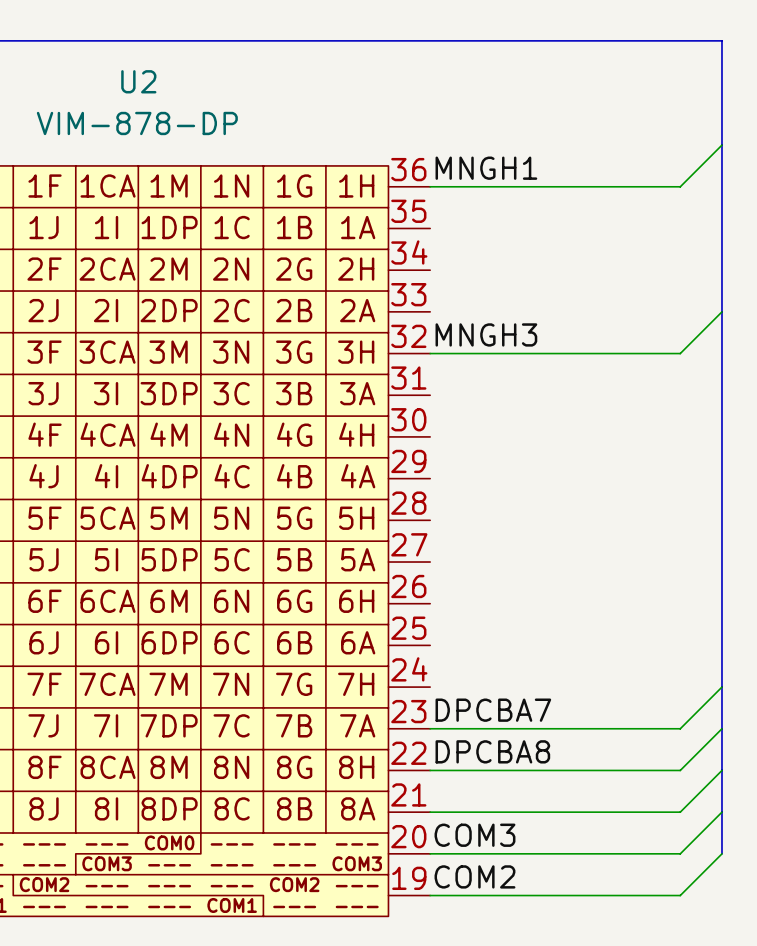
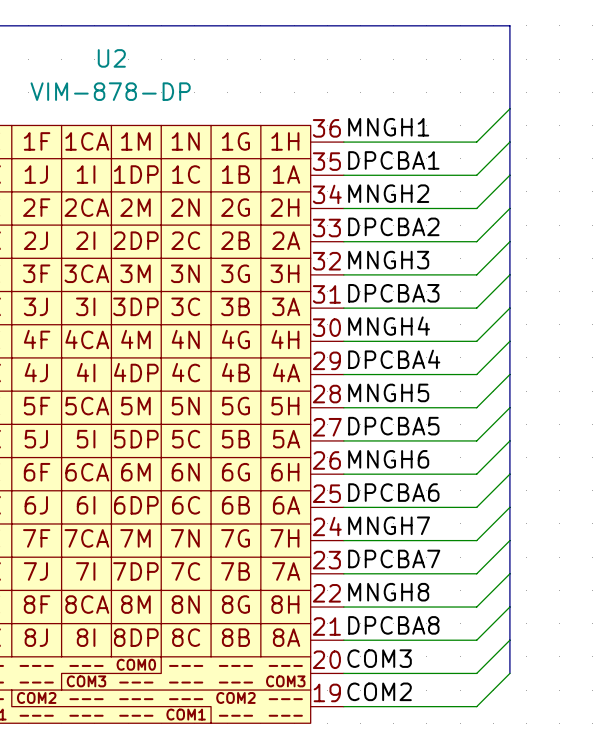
bus: (638, 40) (721, 40) (721, 853) -> (509, 25) (509, 673)
wire: (721, 145) (680, 186) (596, 186) -> (509, 108) (476, 142)
wire: none -> (509, 142) (476, 175) (343, 175)
label: none -> DPCBA1 (393, 160)
wire: none -> (509, 175) (476, 208) (343, 208)
label: none -> MNGH2 (388, 193)
wire: none -> (509, 208) (476, 241) (343, 241)
label: none -> DPCBA2 (393, 226)
wire: (721, 311) (680, 353) (596, 353) -> (509, 241) (476, 274)
wire: none -> (509, 274) (476, 308) (343, 308)
label: none -> DPCBA3 (393, 293)
wire: none -> (509, 308) (476, 341) (343, 341)
label: none -> MNGH4 (389, 326)
wire: none -> (509, 341) (476, 374) (343, 374)
label: none -> DPCBA4 (394, 359)
wire: none -> (509, 374) (476, 407) (343, 407)
label: none -> MNGH5 (388, 392)
wire: none -> (509, 407) (476, 440) (343, 440)
label: none -> DPCBA5 (393, 426)
wire: none -> (509, 440) (476, 474) (343, 474)
label: none -> MNGH6 (388, 459)
wire: none -> (509, 474) (476, 507) (343, 507)
label: none -> DPCBA6 (393, 492)
wire: none -> (509, 507) (476, 540) (343, 540)
label: none -> MNGH7 (389, 525)
wire: (721, 687) (680, 728) (596, 728) -> (509, 540) (476, 573)
wire: (721, 728) (680, 770) (596, 770) -> (509, 573) (476, 607)
label: DPCBA8 (492, 751) -> MNGH8 (388, 592)
wire: (721, 770) (680, 812) (596, 812) -> (509, 607) (476, 640)
label: none -> DPCBA8 (393, 625)
wire: (721, 812) (680, 853) (596, 853) -> (509, 640) (476, 673)
wire: (721, 853) (680, 895) (596, 895) -> (509, 673) (476, 706)

